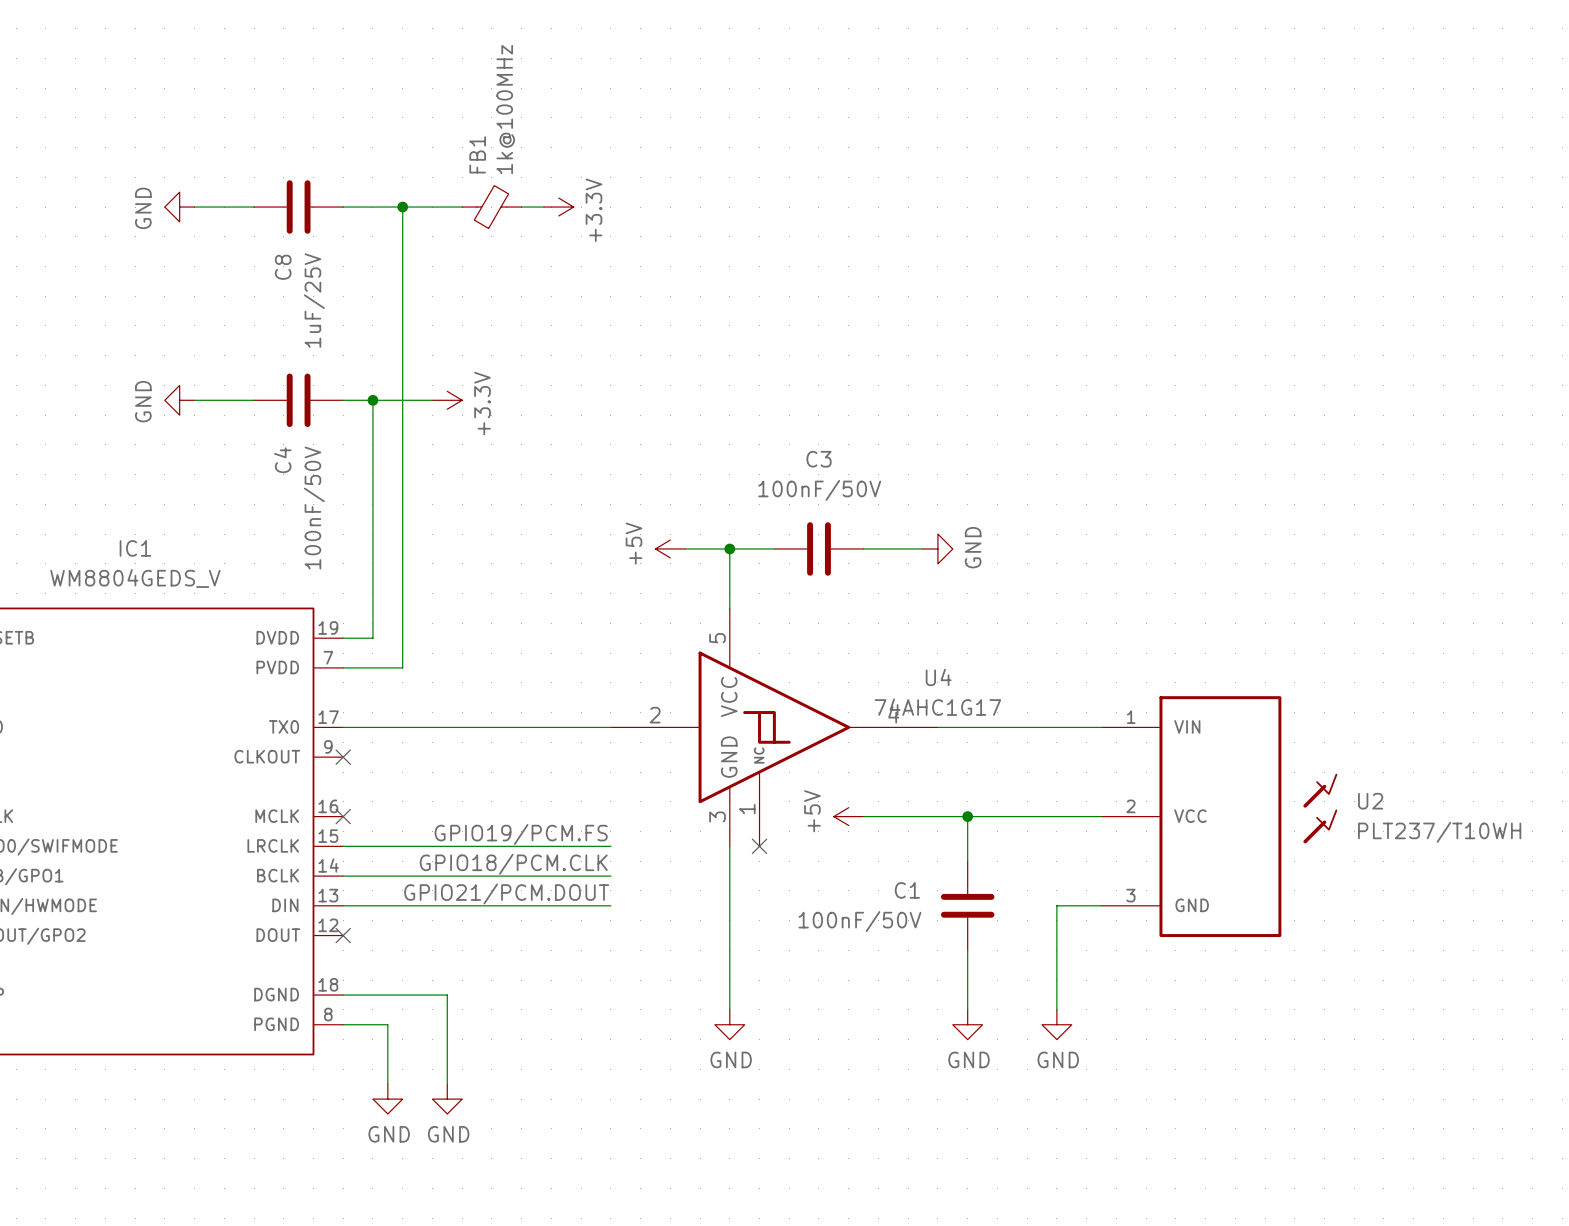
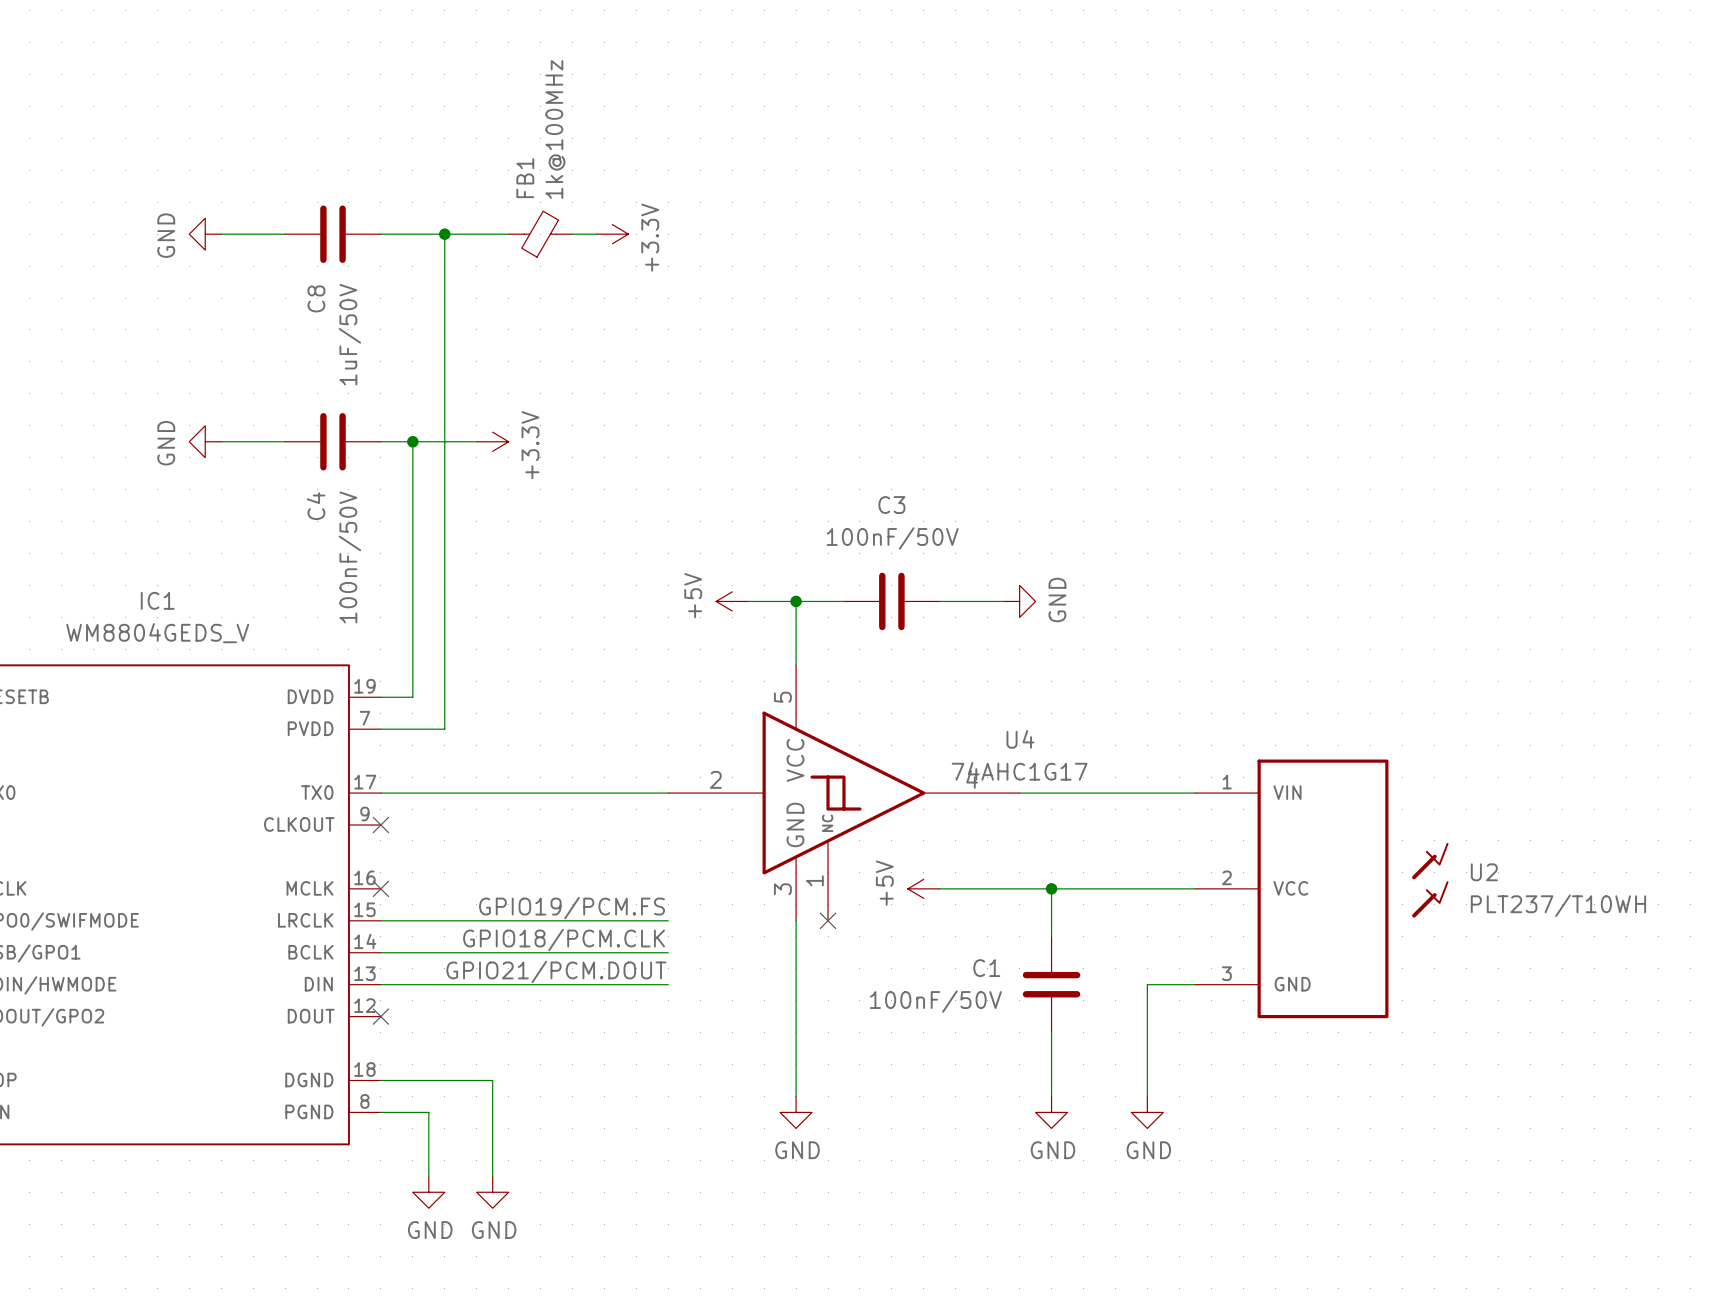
C8 value: 1uF/25V (314, 300) -> 1uF/50V (349, 334)

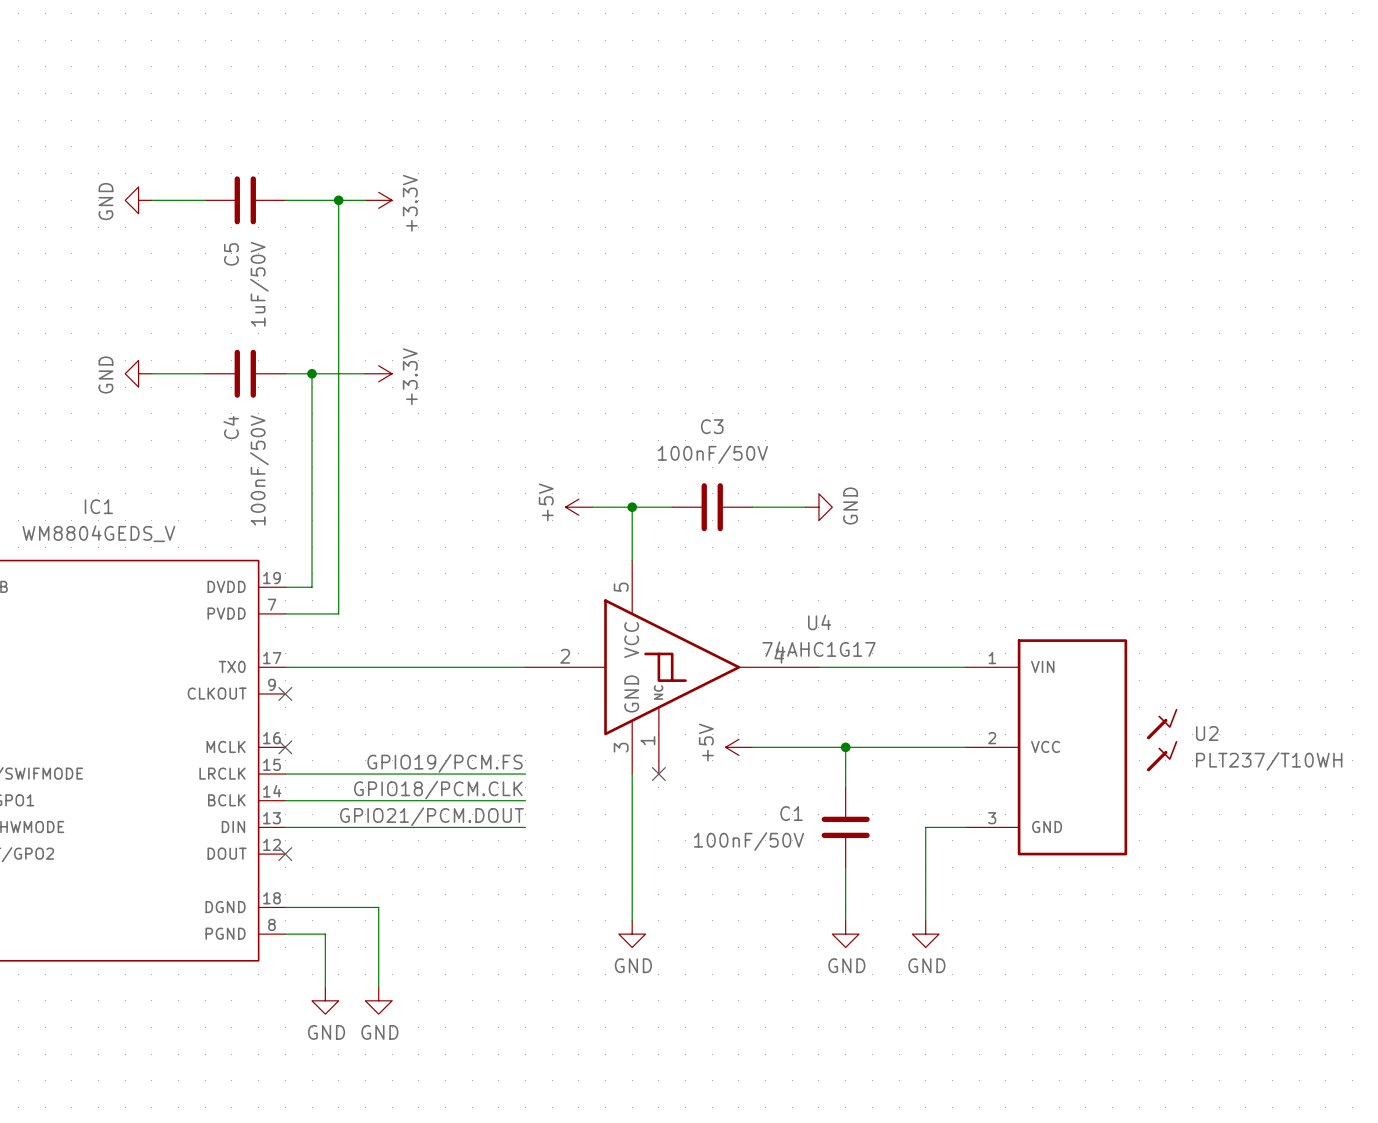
FB1: 1k@100MHz (540, 234) -> none
wire: (572, 234) (596, 234) -> none
power symbol position: +3.3V (612, 234) -> +3.3V (378, 200)
C8 name: C8 (316, 298) -> C5 (231, 254)

